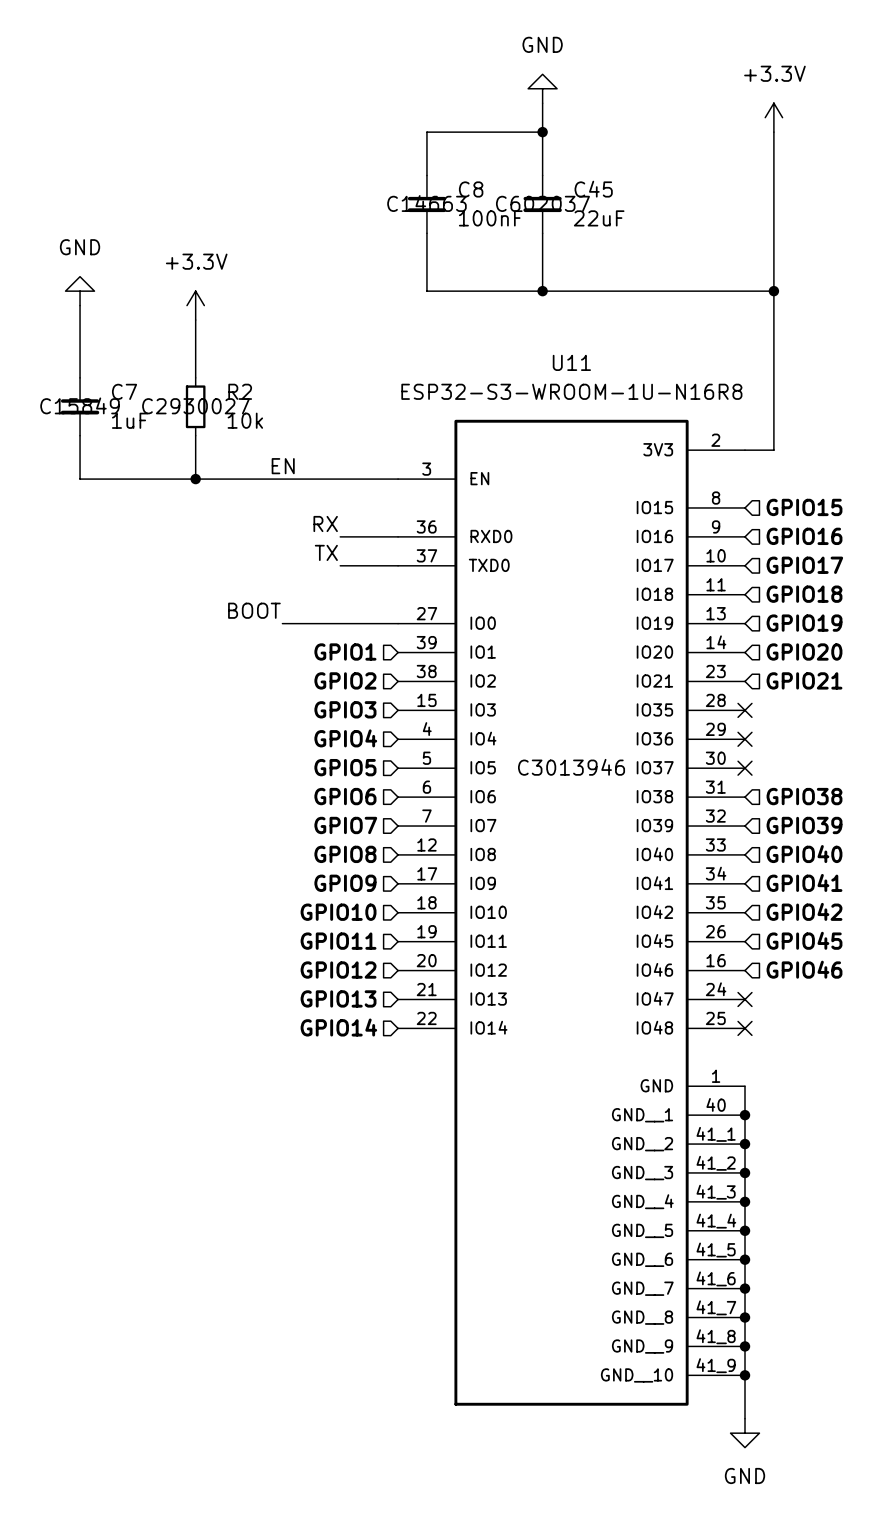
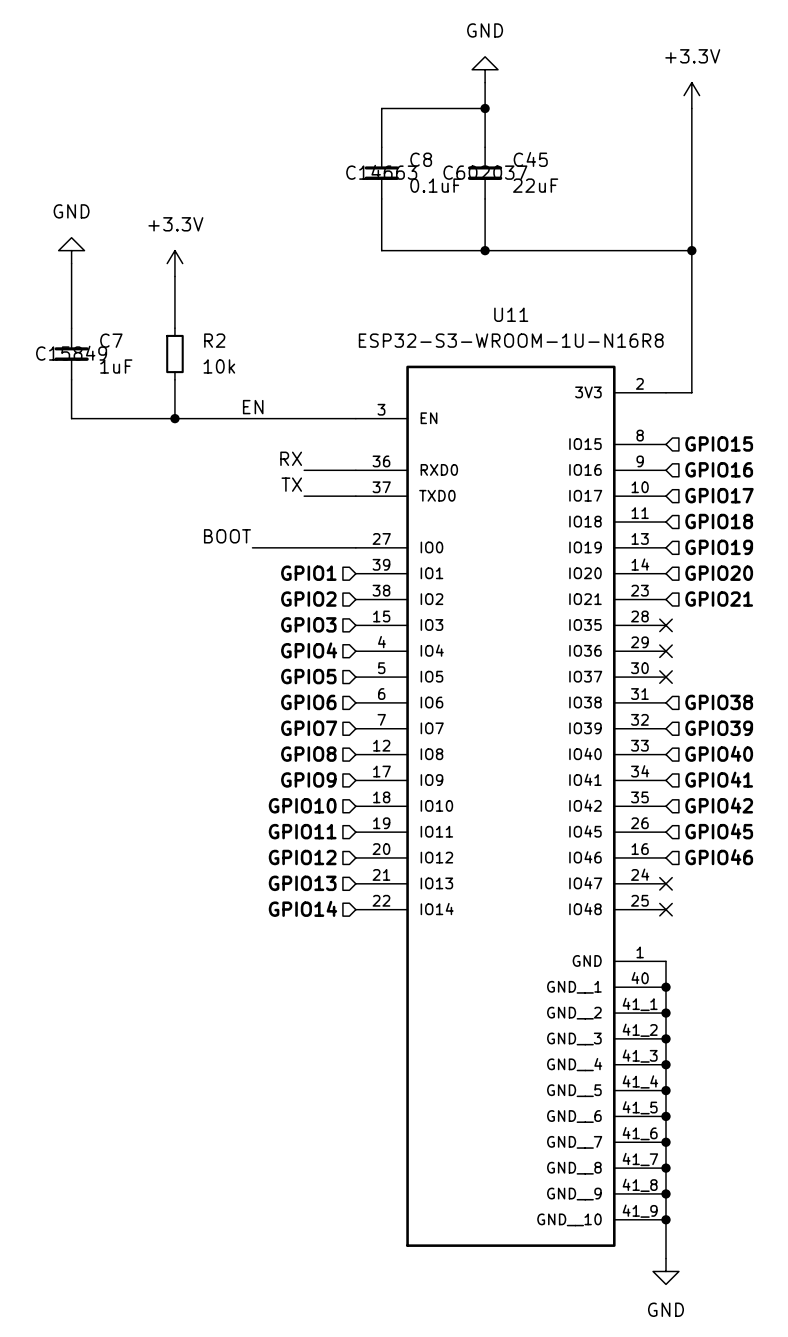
C8 value: 100nF (490, 218) -> 0.1uF (435, 185)
R2 text: C2930027 (196, 406) -> none
U11 text: C3013946 (571, 767) -> none

